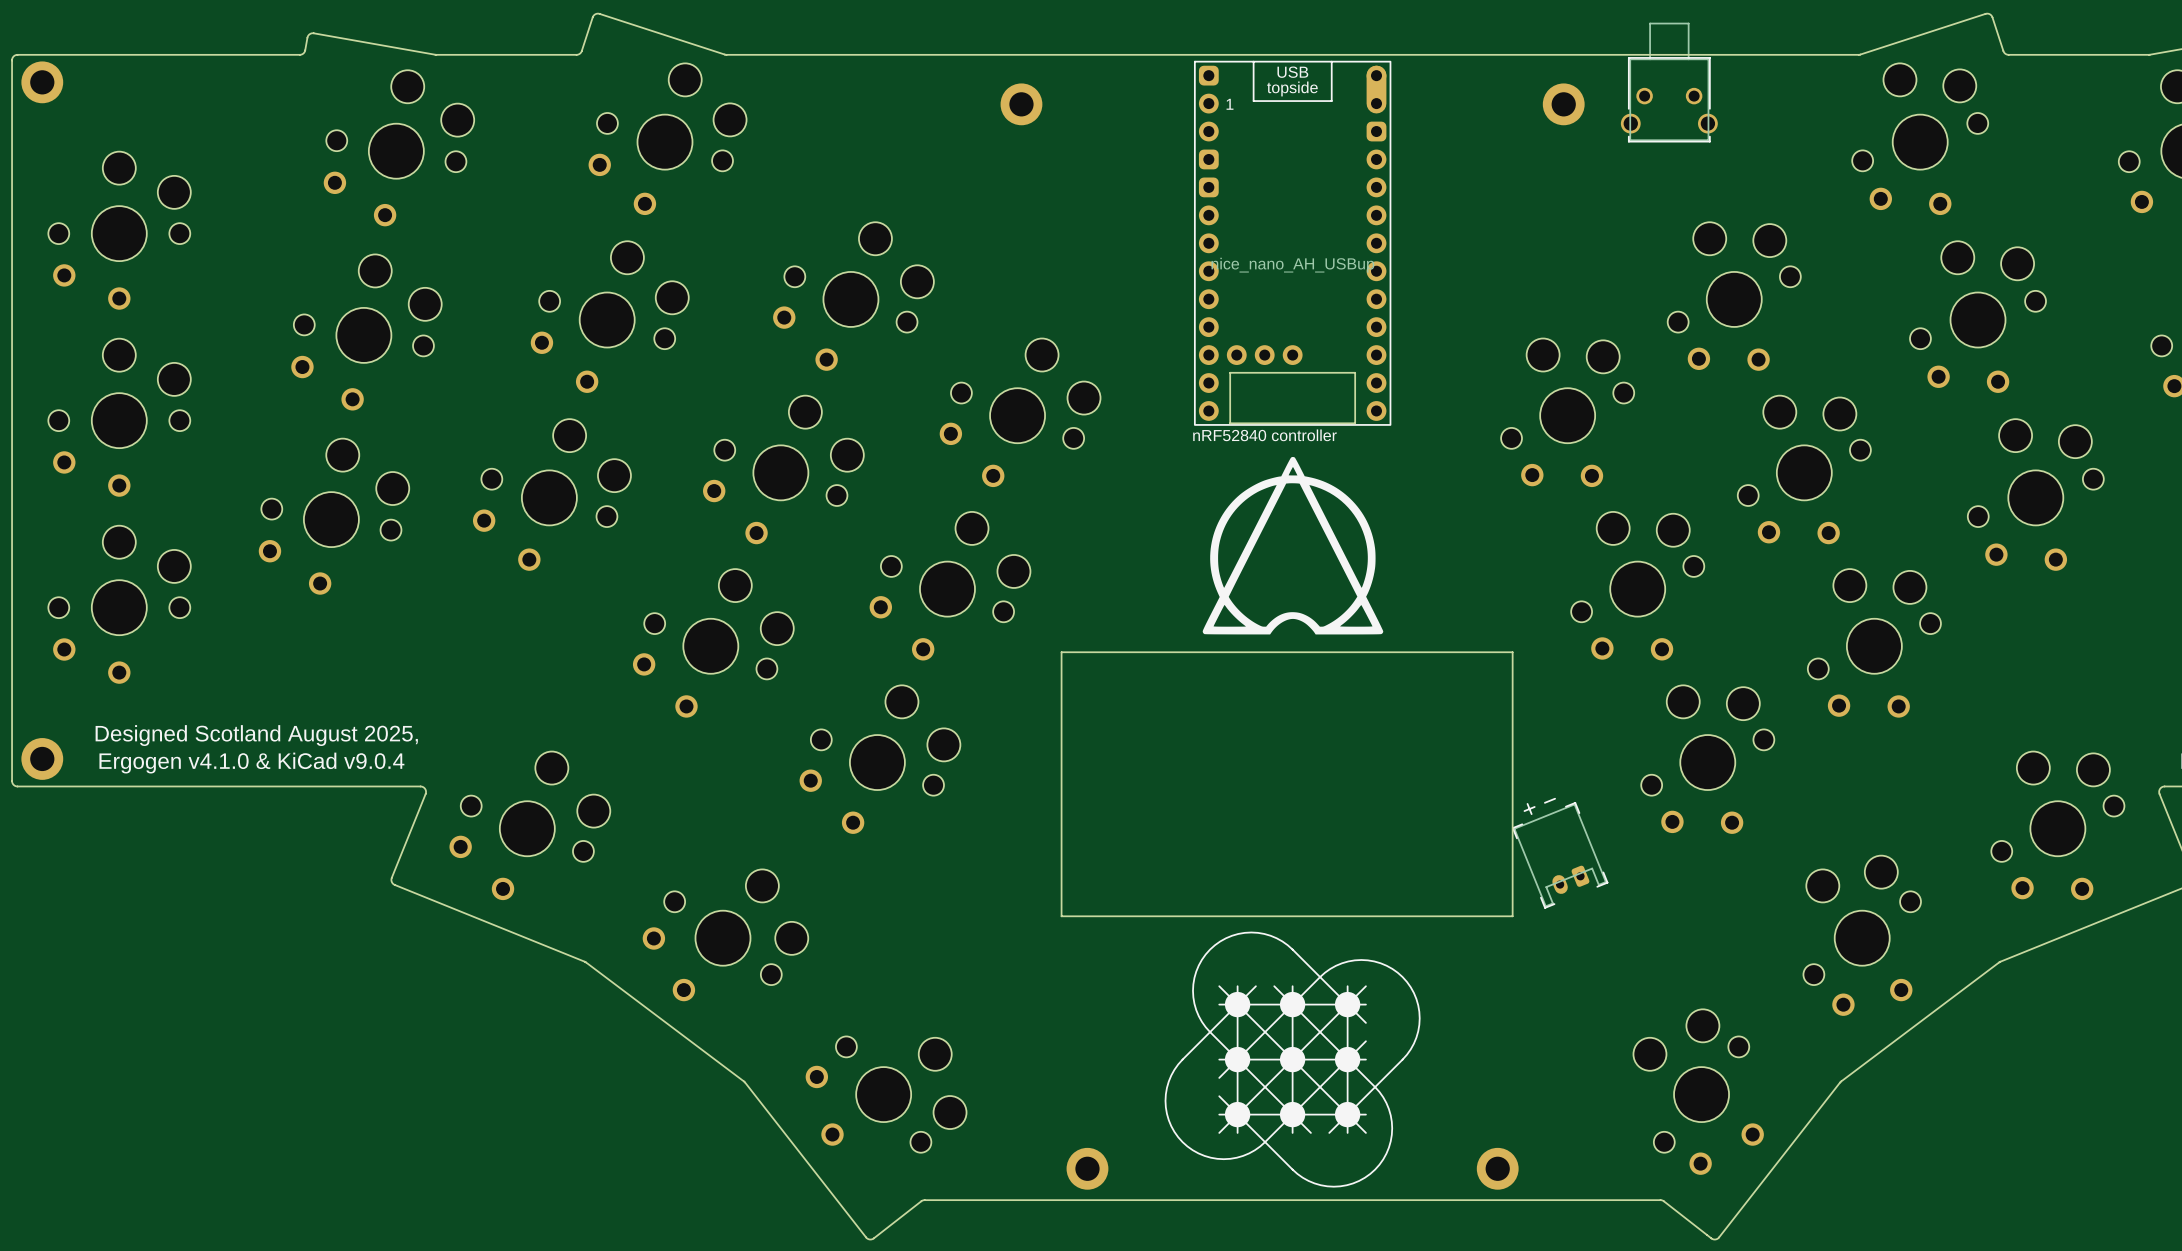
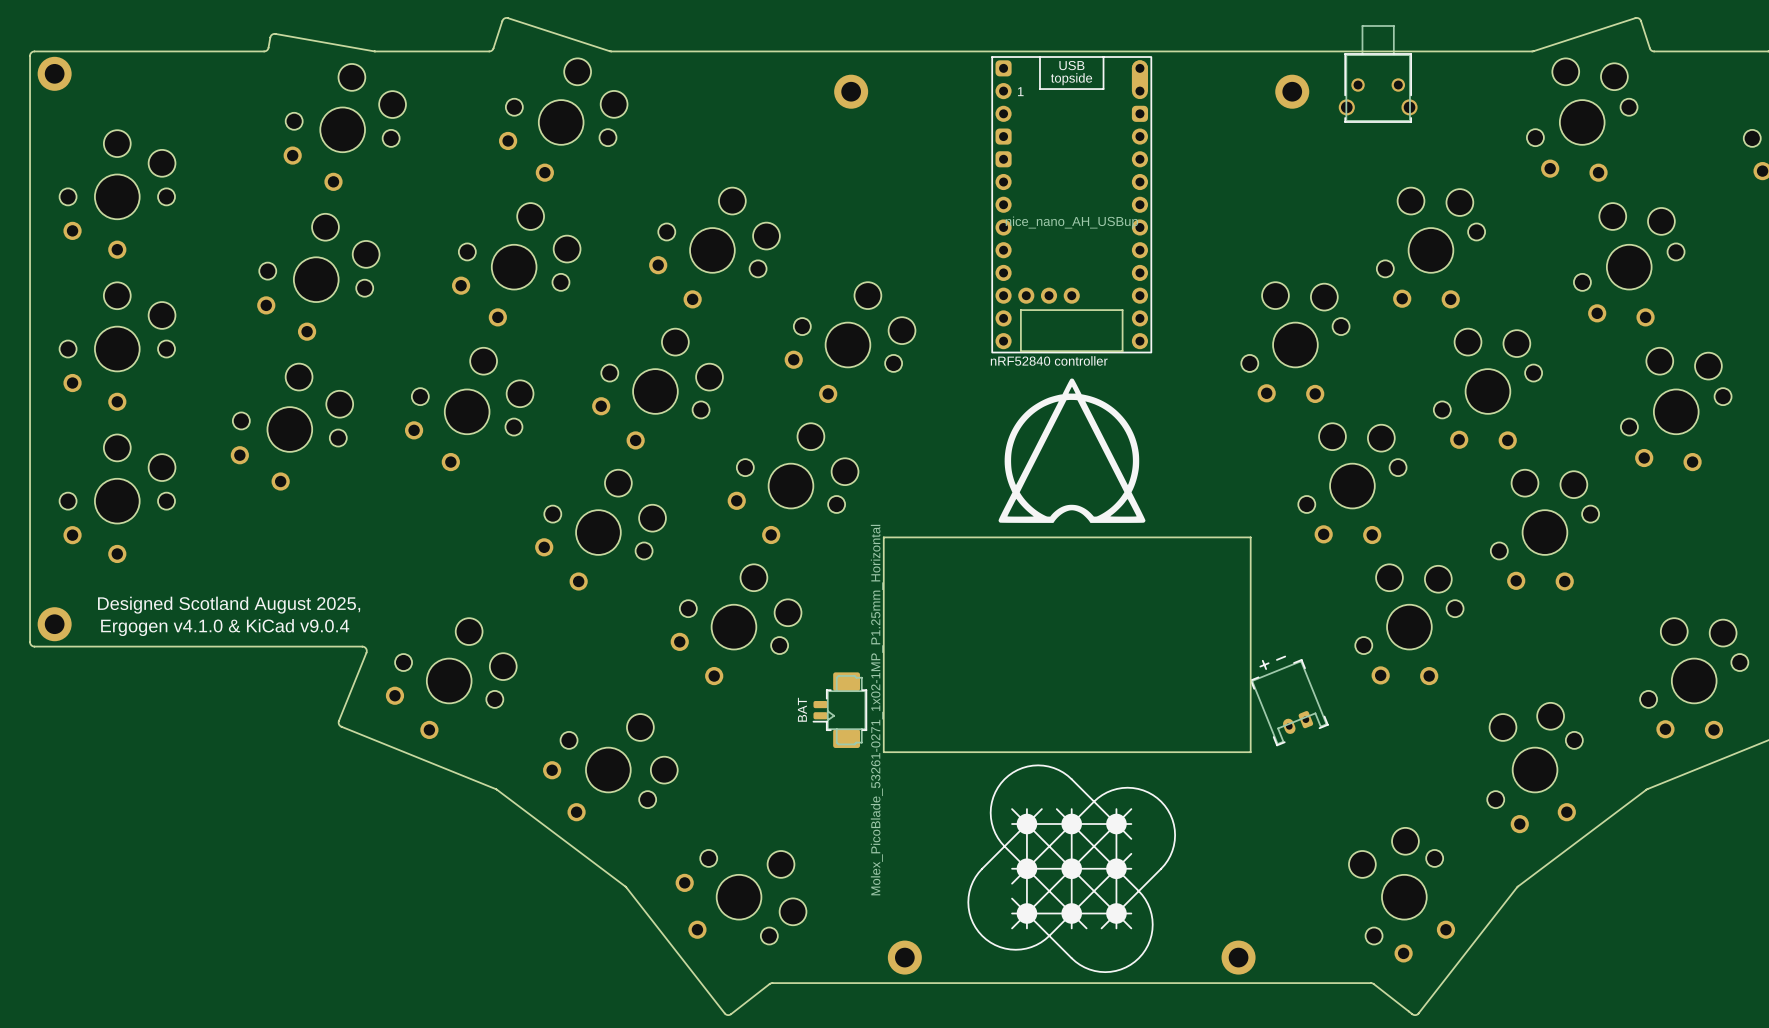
BAT: none -> Molex_PicoBlade_53261-0271_1x02-1MP_P1.25mm_Horizontal (839, 710)

